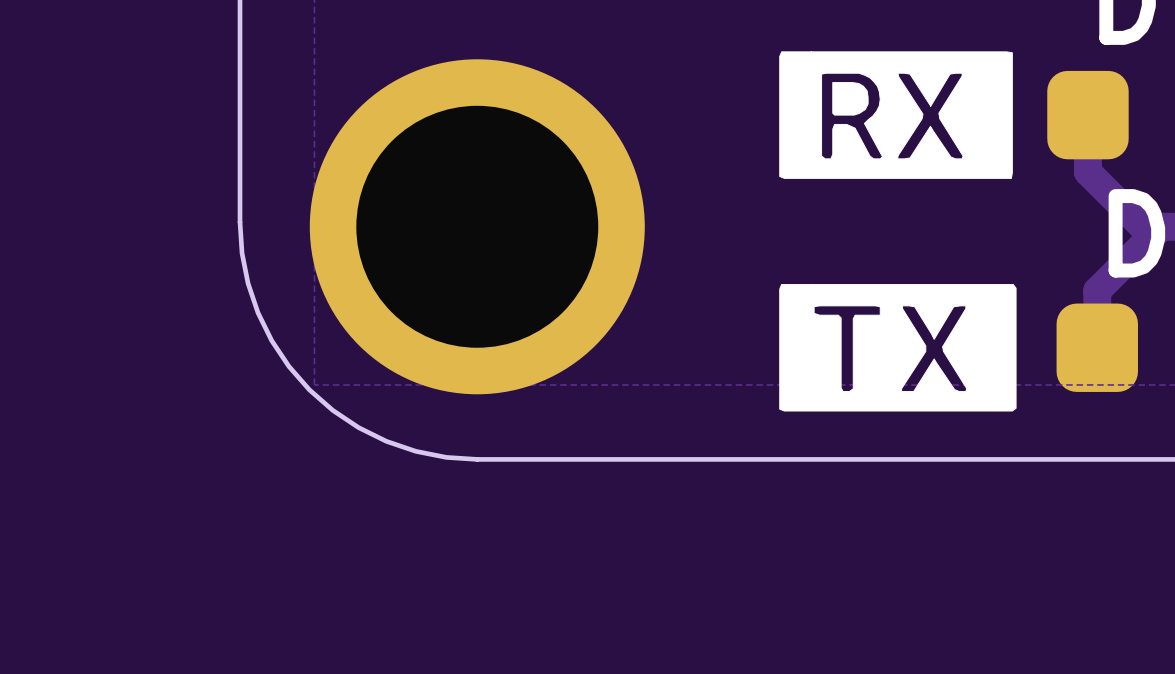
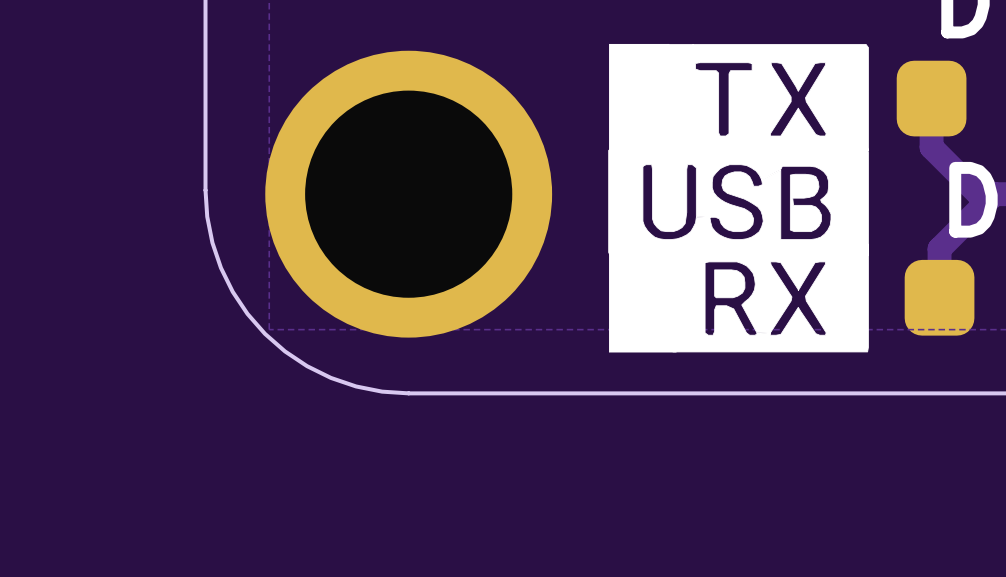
drawing: none -> [608, 43, 869, 353]
drawing position: (896, 115) -> (768, 297)
drawing position: (897, 347) -> (767, 98)

